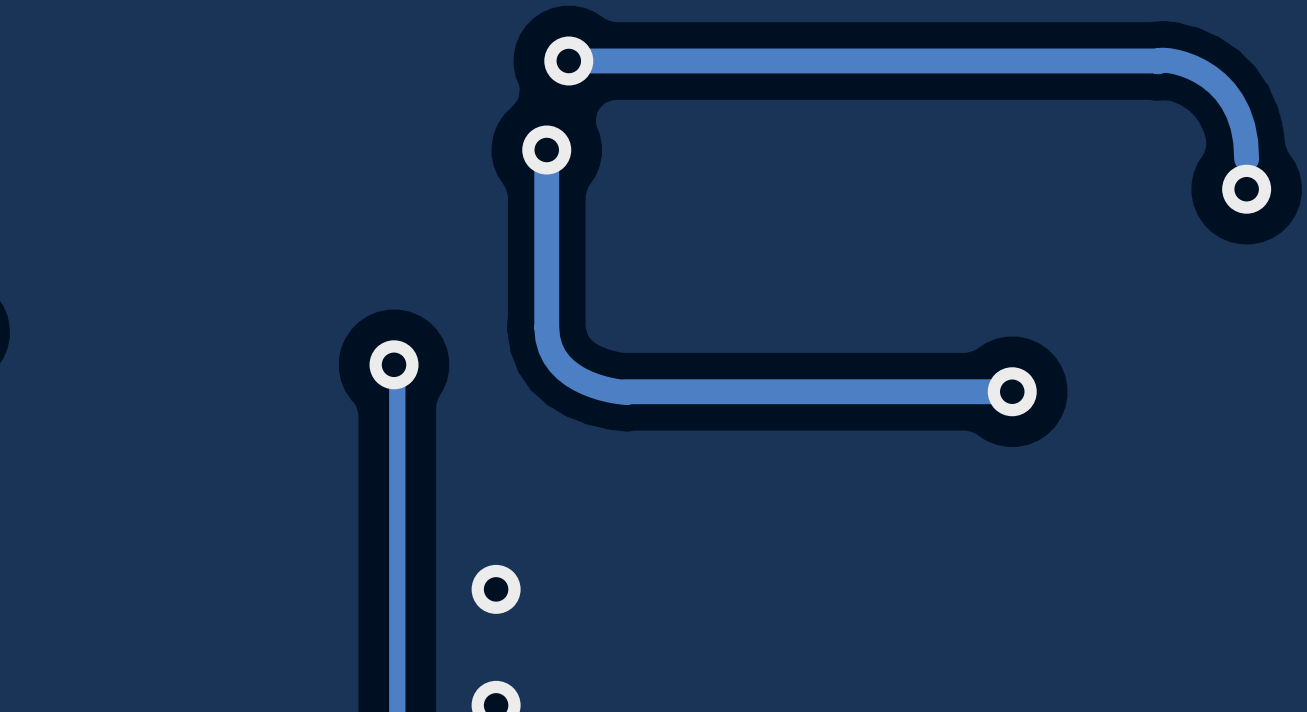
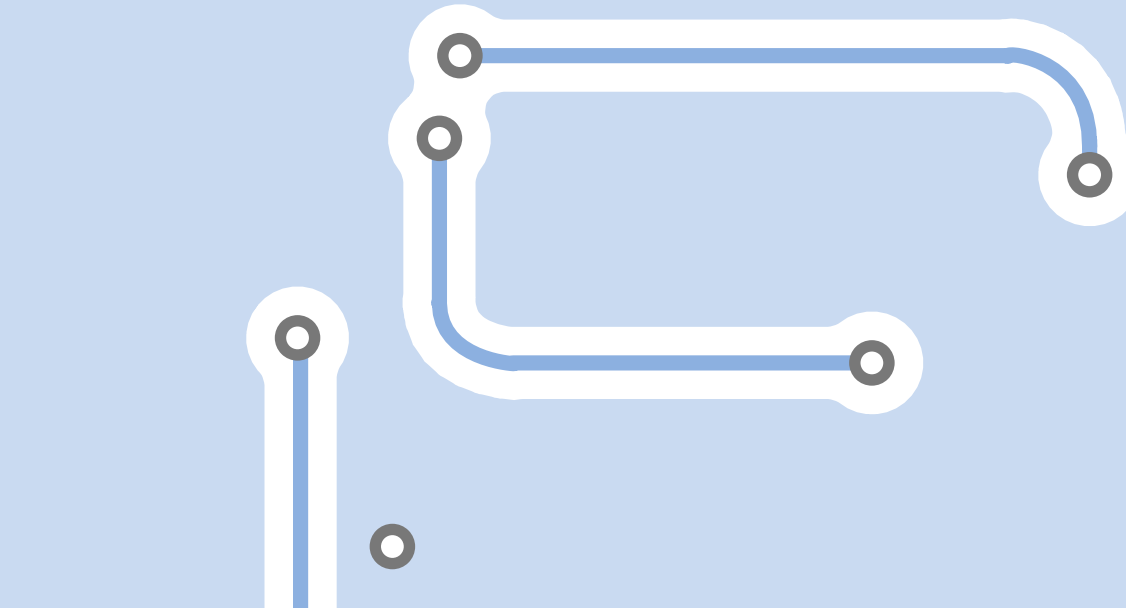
track width: thick (1155, 60) (568, 60) -> thin (1005, 55) (459, 55)
track width: thick (1158, 61) (1169, 60) (1191, 67) (1208, 76) (1225, 91) (1238, 112) (1242, 126) (1246, 158) -> thin (1007, 56) (1017, 55) (1038, 61) (1054, 70) (1069, 84) (1081, 103) (1086, 116) (1089, 146)
track width: thick (546, 150) (546, 326) -> thin (439, 138) (439, 302)
track width: thick (546, 328) (550, 348) (565, 369) (579, 379) (594, 385) (626, 392) -> thin (439, 303) (442, 322) (457, 342) (483, 357) (513, 363)
track width: thick (1012, 391) (625, 391) -> thin (871, 362) (513, 362)

